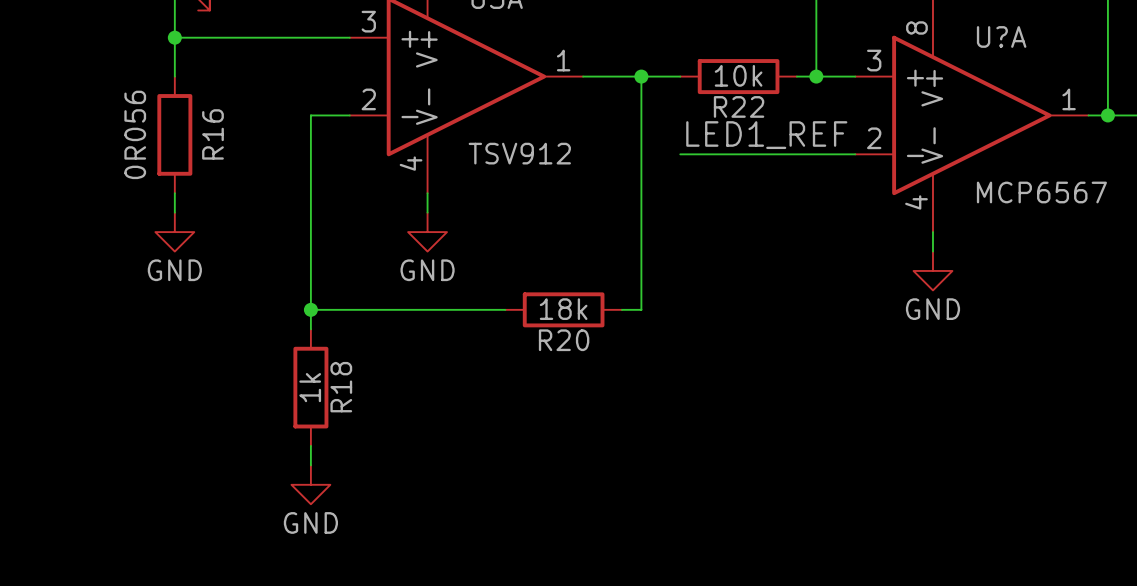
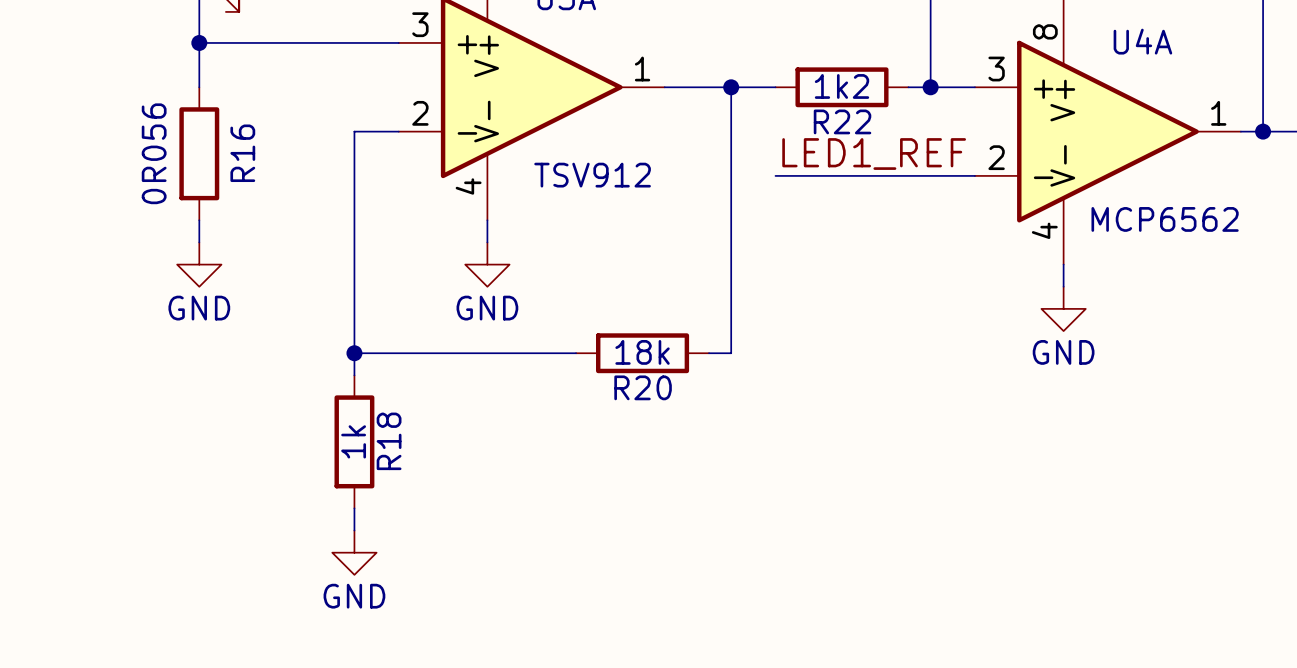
U?A name: U?A (1001, 36) -> U4A (1142, 41)
R22 value: 10k (738, 75) -> 1k2 (841, 86)
U?A value: MCP6567 (1041, 192) -> MCP6562 (1165, 219)

